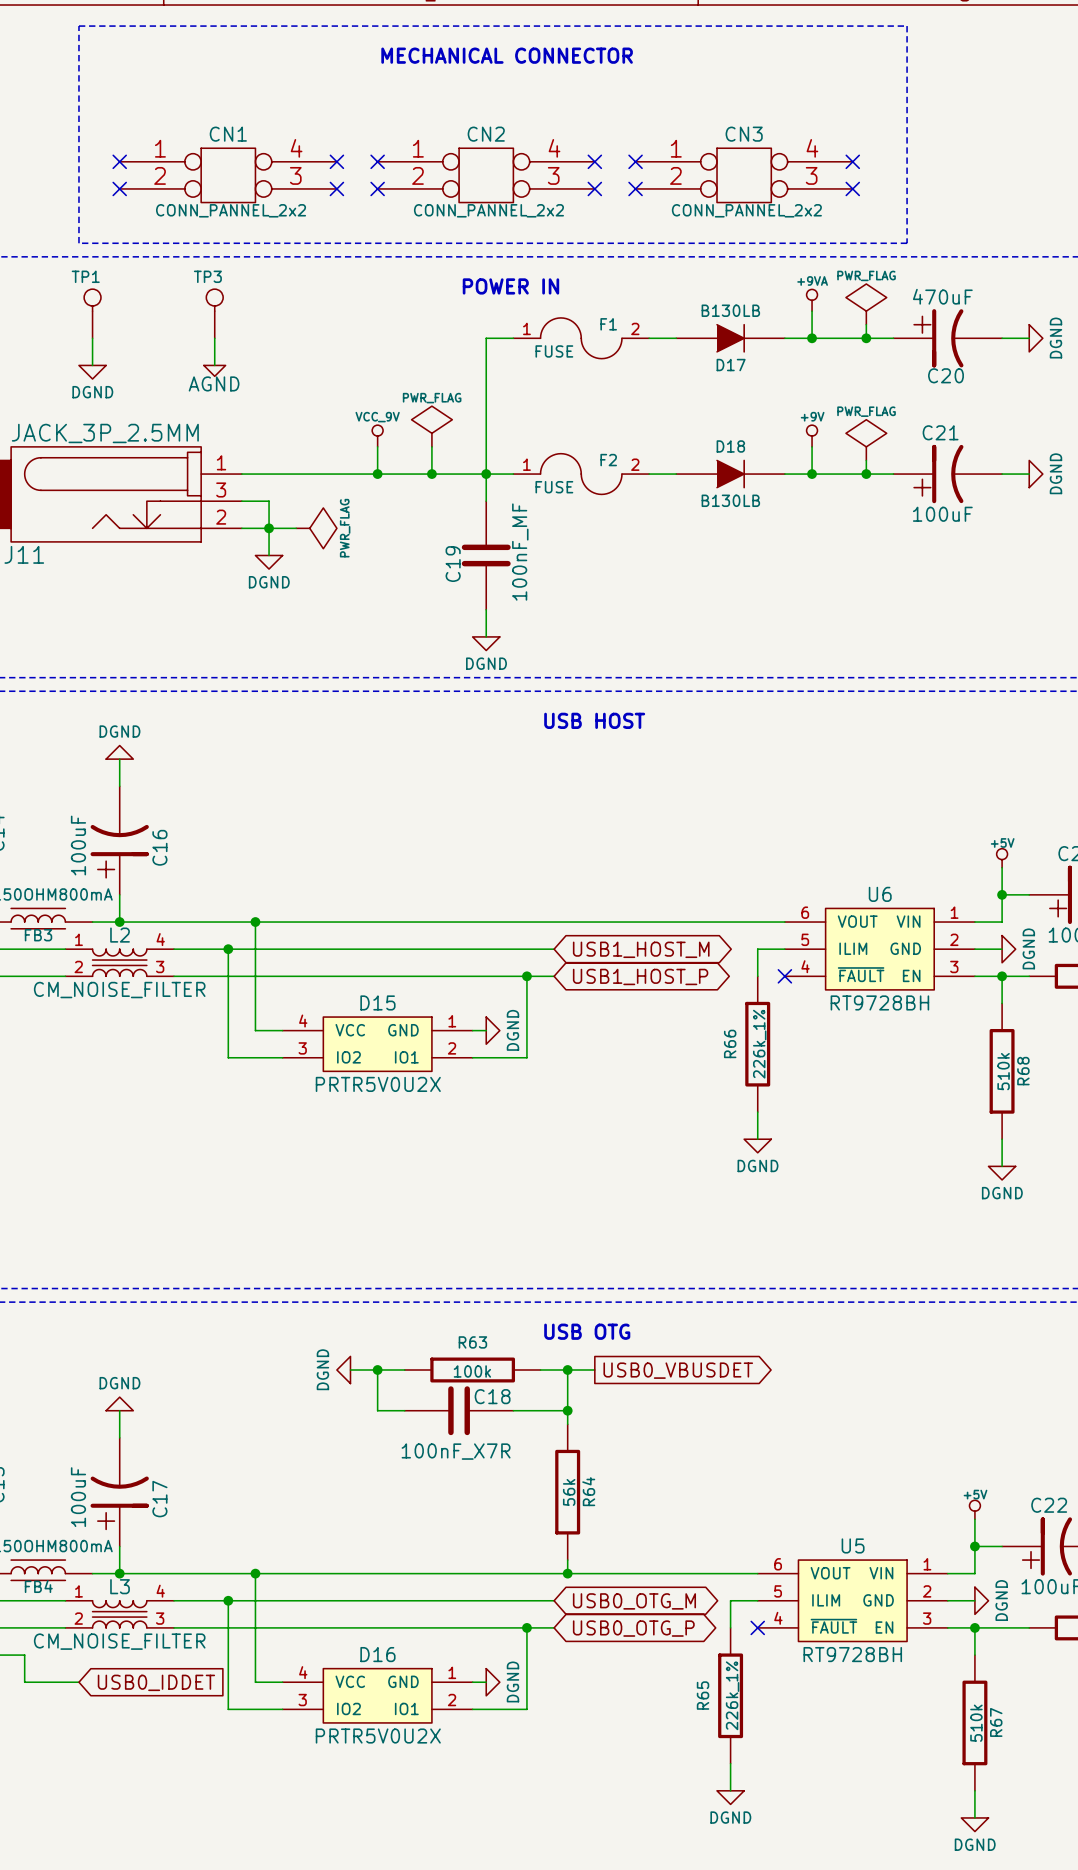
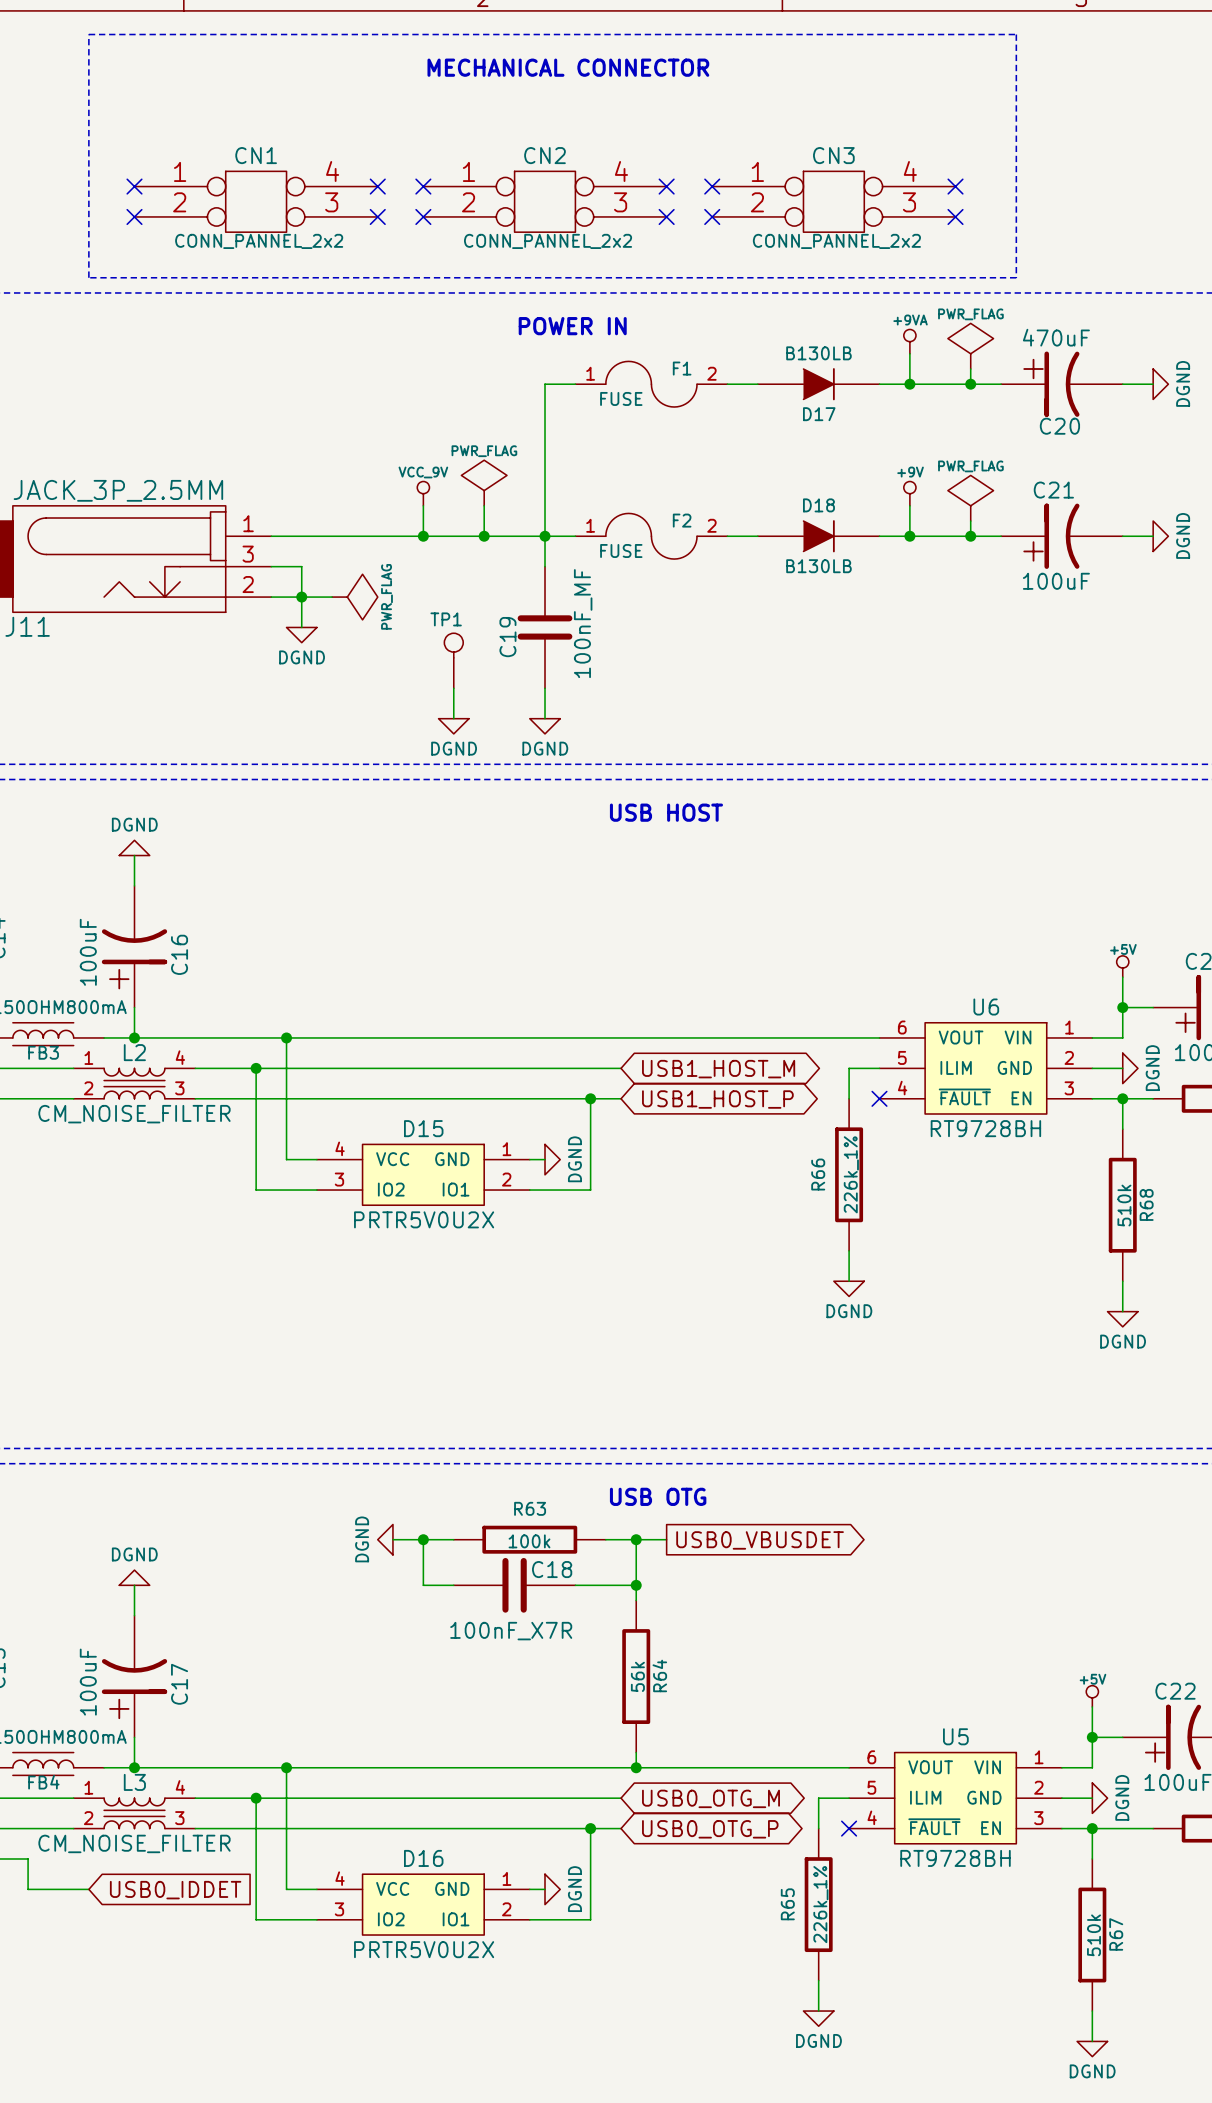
TP1 position: (92, 313) -> (453, 660)
TP3: (214, 313) -> none
wire: (92, 338) (92, 365) -> none
wire: (214, 338) (214, 365) -> none
power symbol: AGND (214, 370) -> none
power symbol: DGND (92, 372) -> none
wire: none -> (453, 688) (453, 718)
power symbol: none -> DGND (453, 726)

